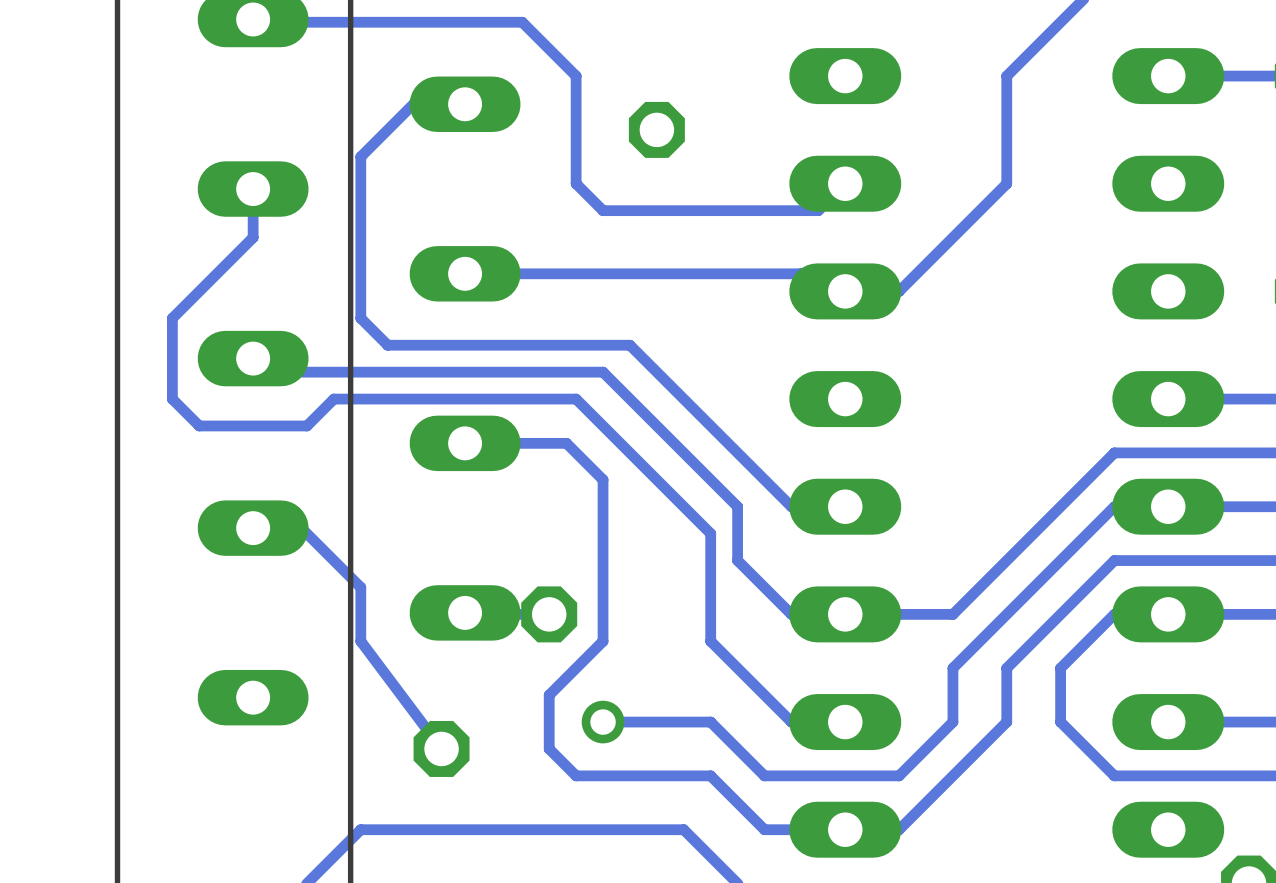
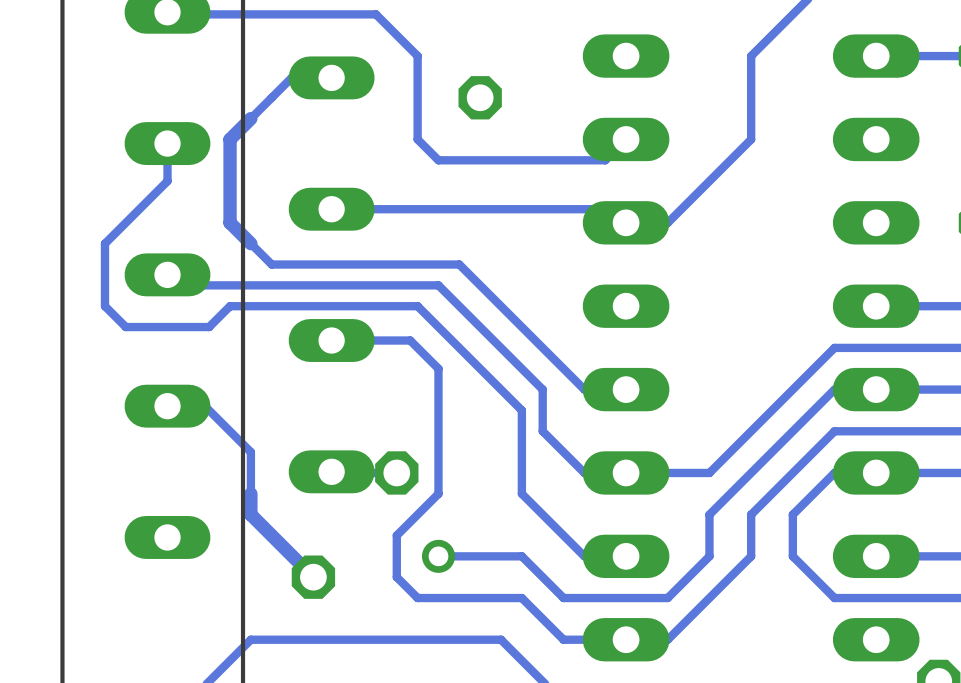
track: (360, 156) (360, 318) -> (250, 118) (230, 139) (230, 222) (250, 243)
track: (360, 641) (441, 748) -> (250, 493) (250, 514) (313, 577)

